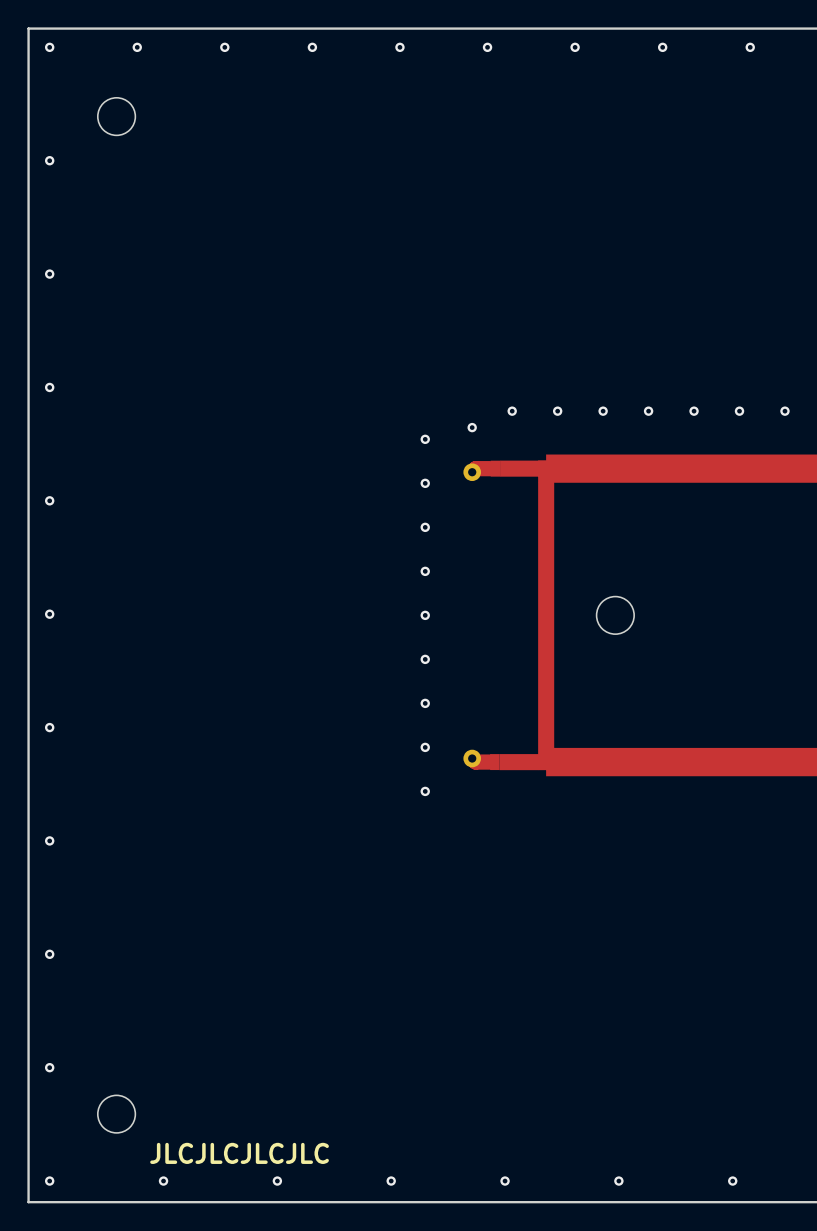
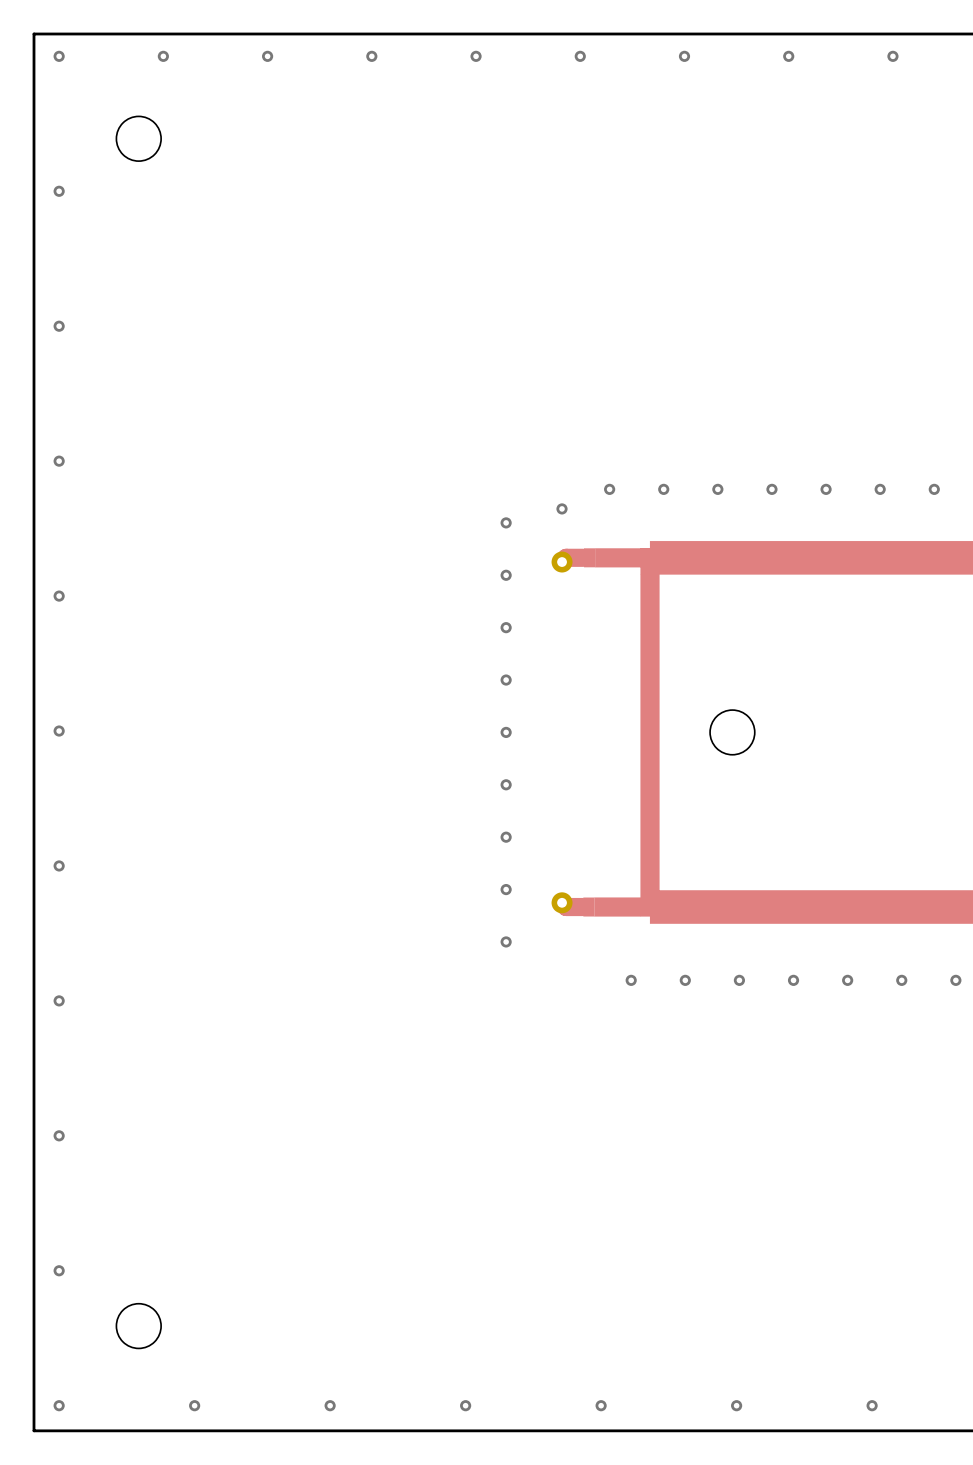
via: none -> (631, 980)
via: none -> (685, 980)
via: none -> (739, 980)
via: none -> (793, 980)
via: none -> (847, 980)
via: none -> (901, 980)
via: none -> (955, 980)
text: JLCJLCJLCJLC (239, 1153) -> none

